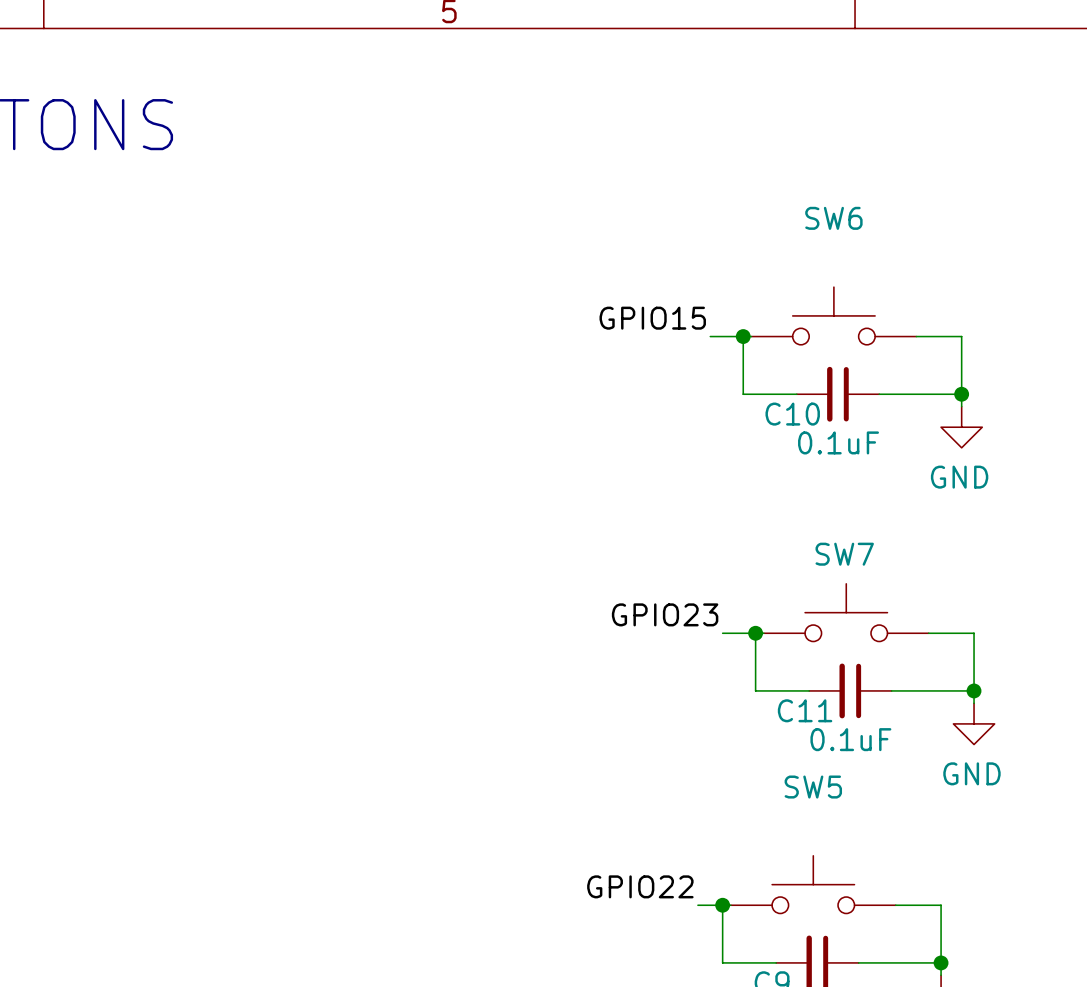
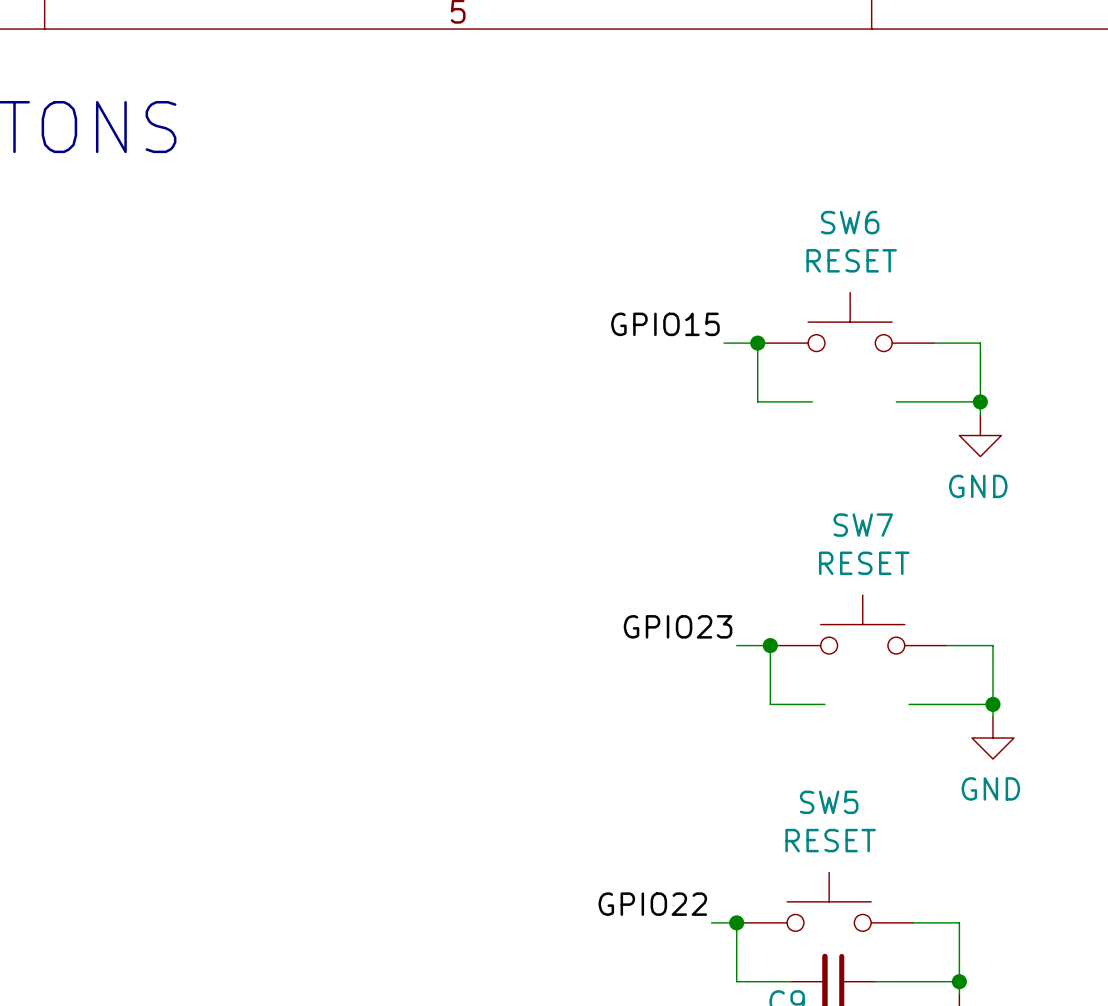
SW6 value: none -> RESET (851, 260)
C10: 0.1uF (838, 394) -> none
SW7 value: none -> RESET (864, 563)
SW7 name position: SW7 (844, 554) -> SW7 (863, 525)
C11: 0.1uF (850, 690) -> none
SW5 value: none -> RESET (830, 840)

